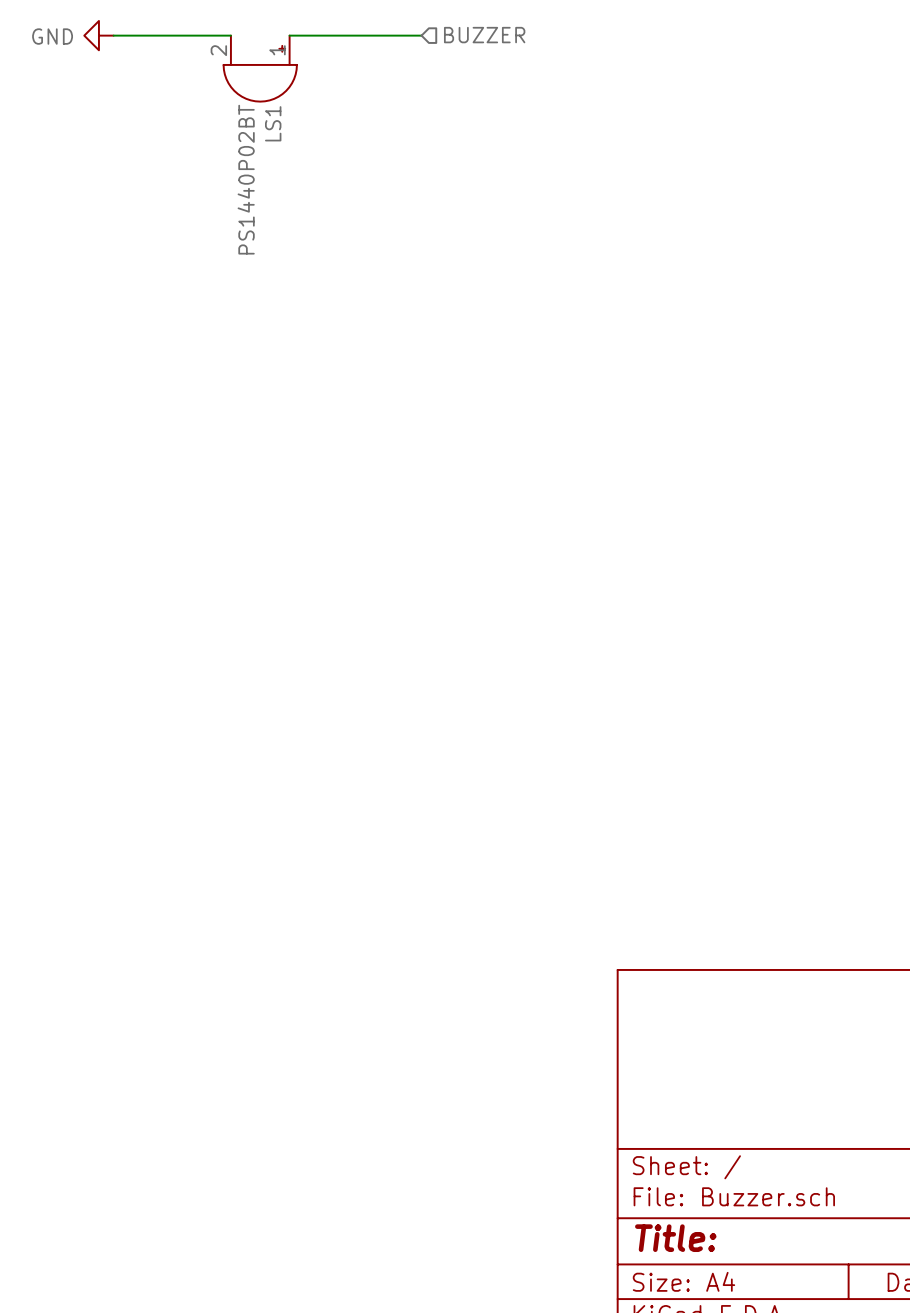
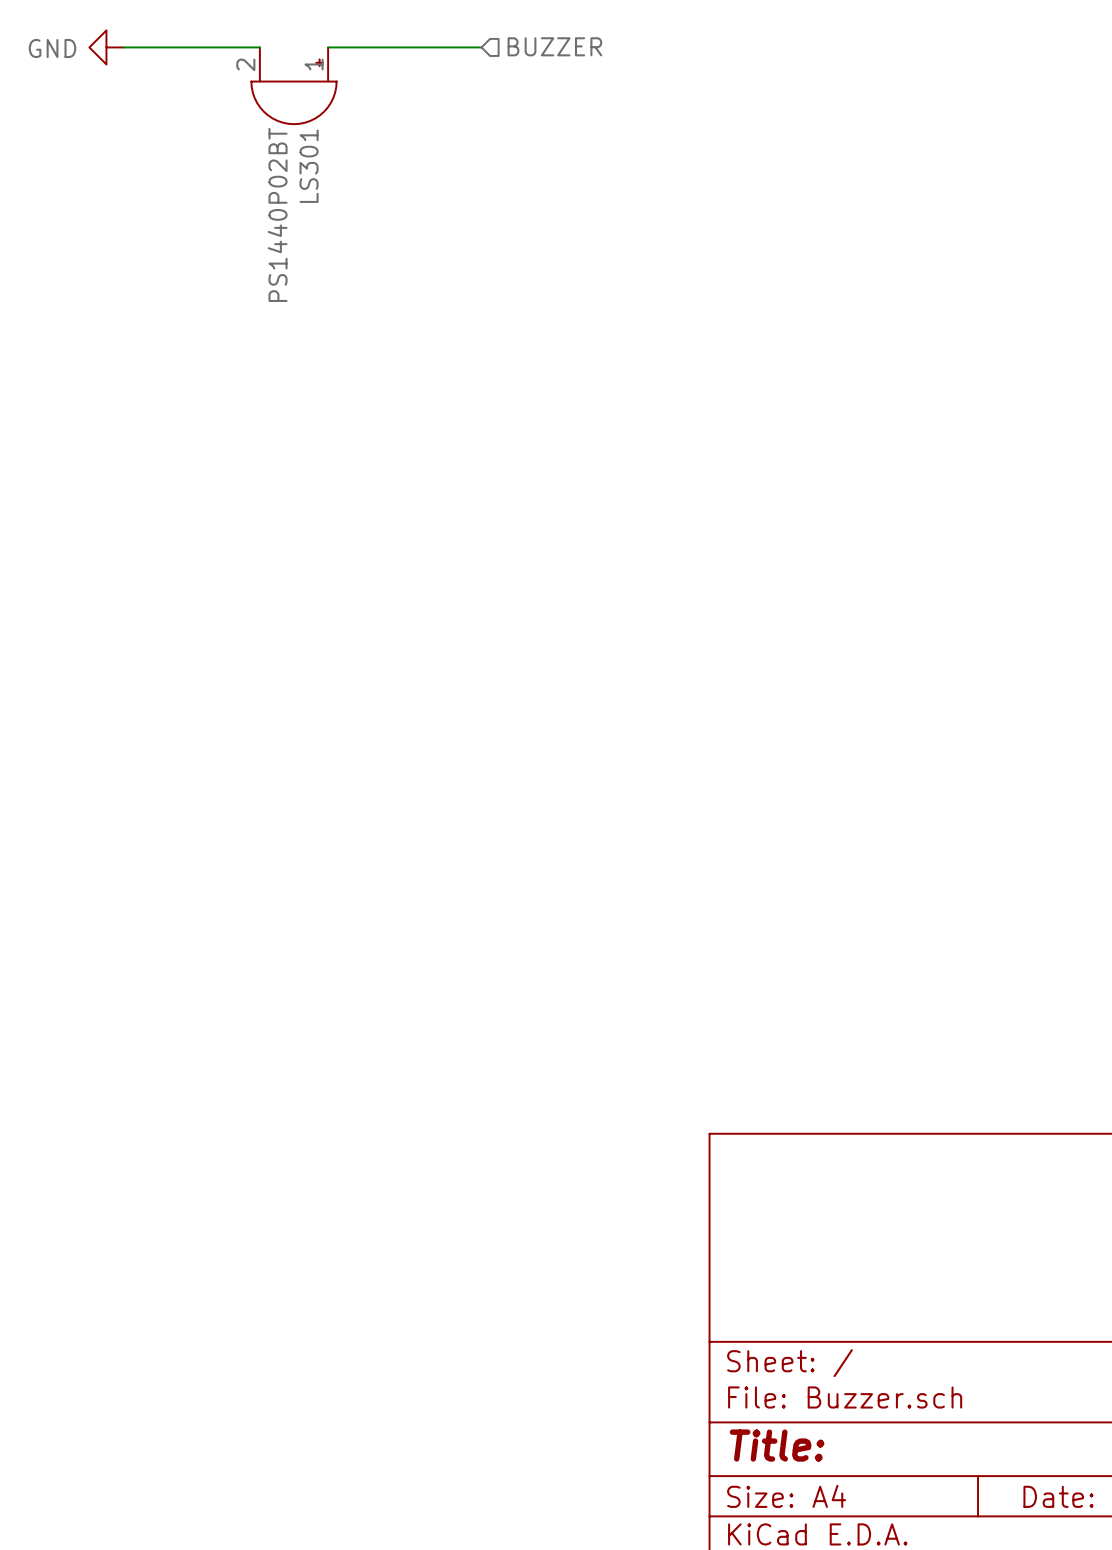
LS1 name: LS1 (273, 123) -> LS301 (309, 166)

